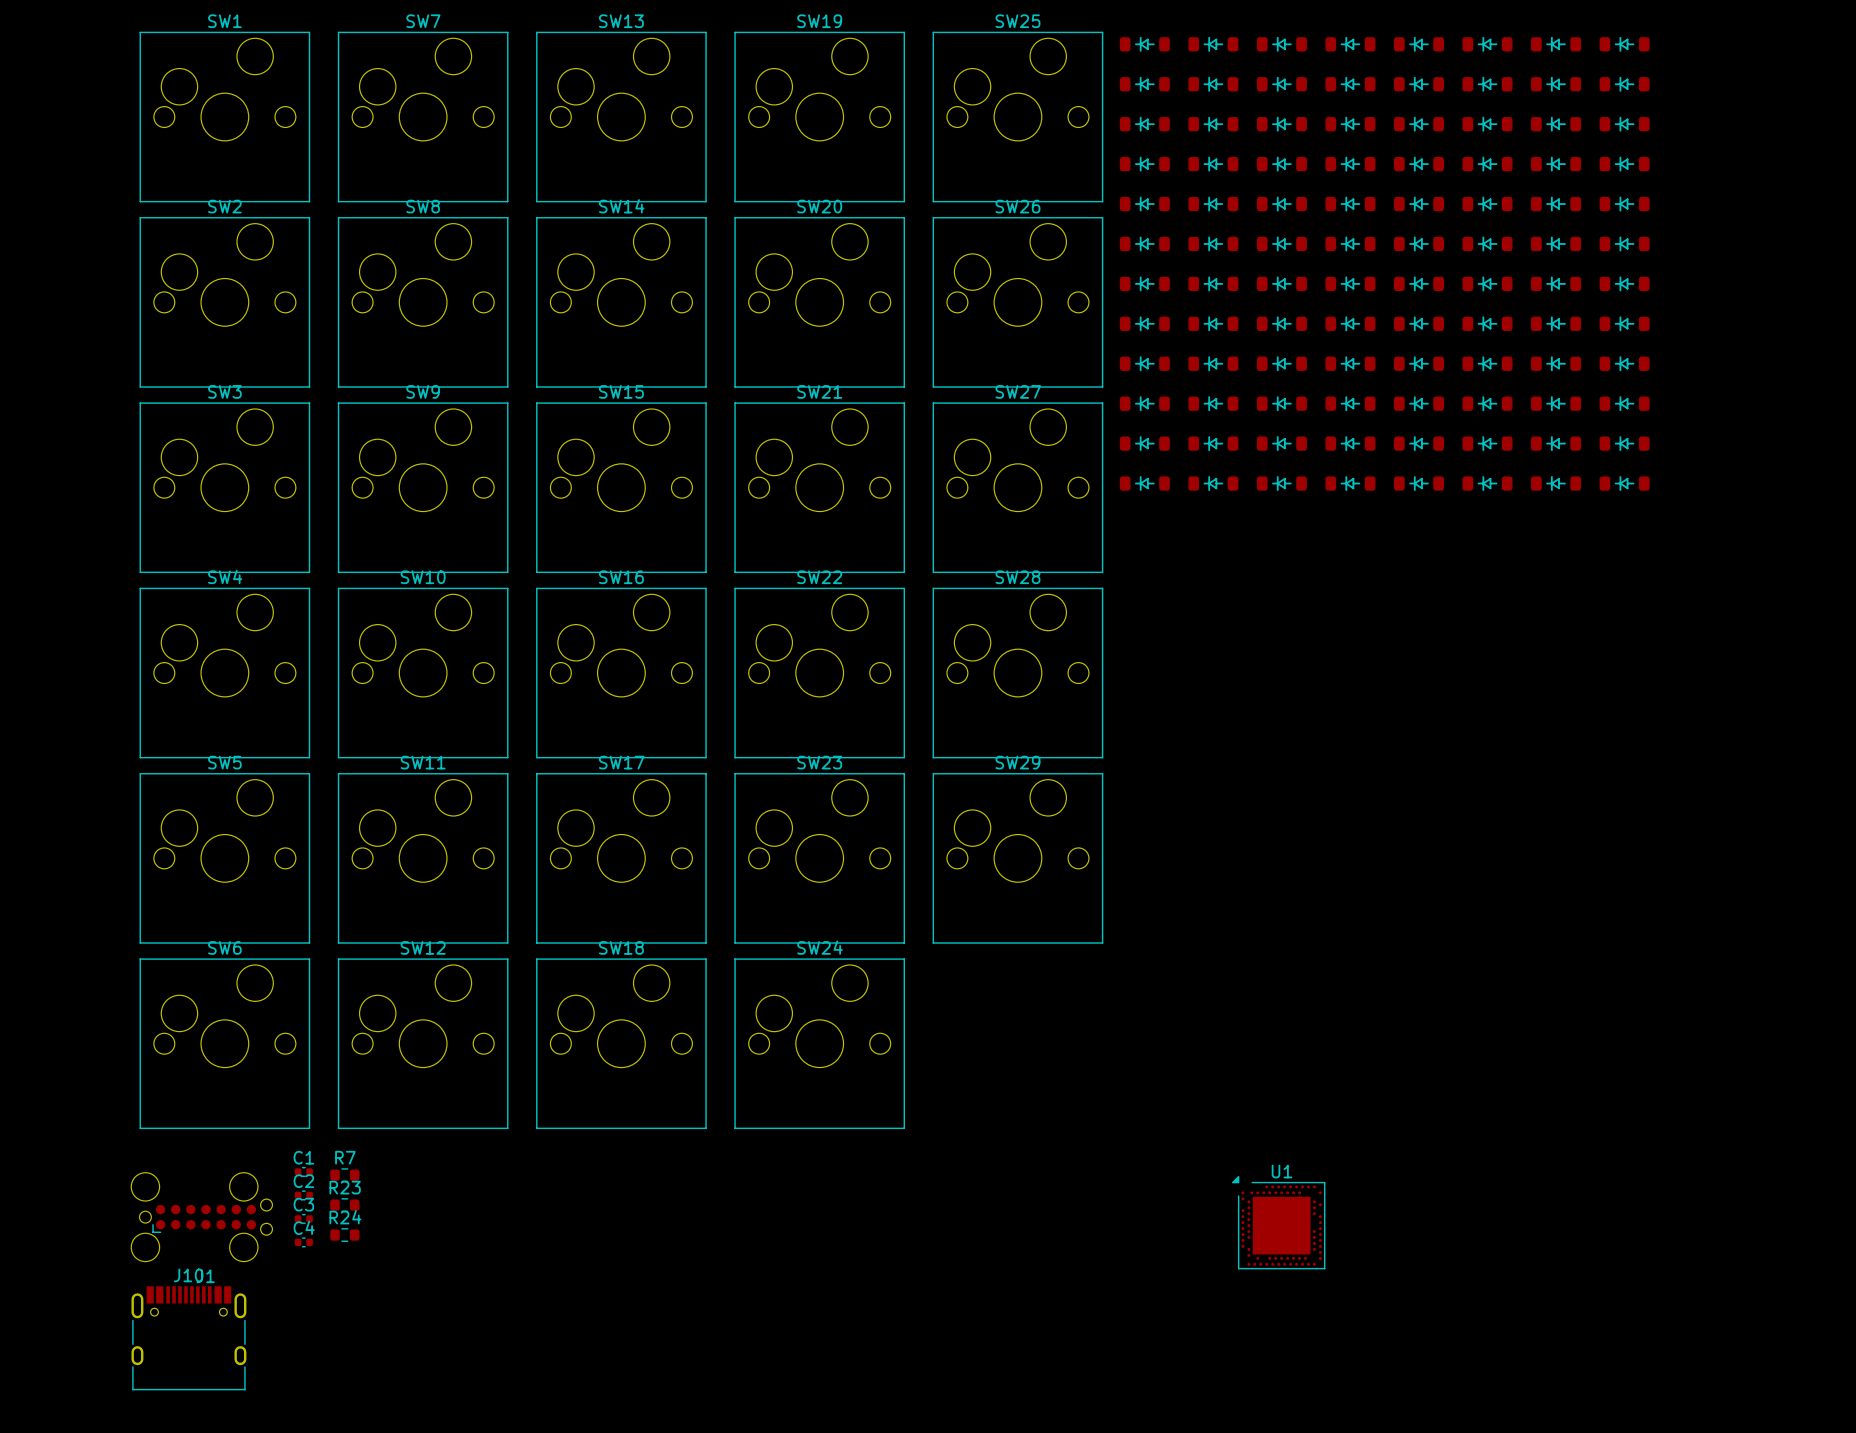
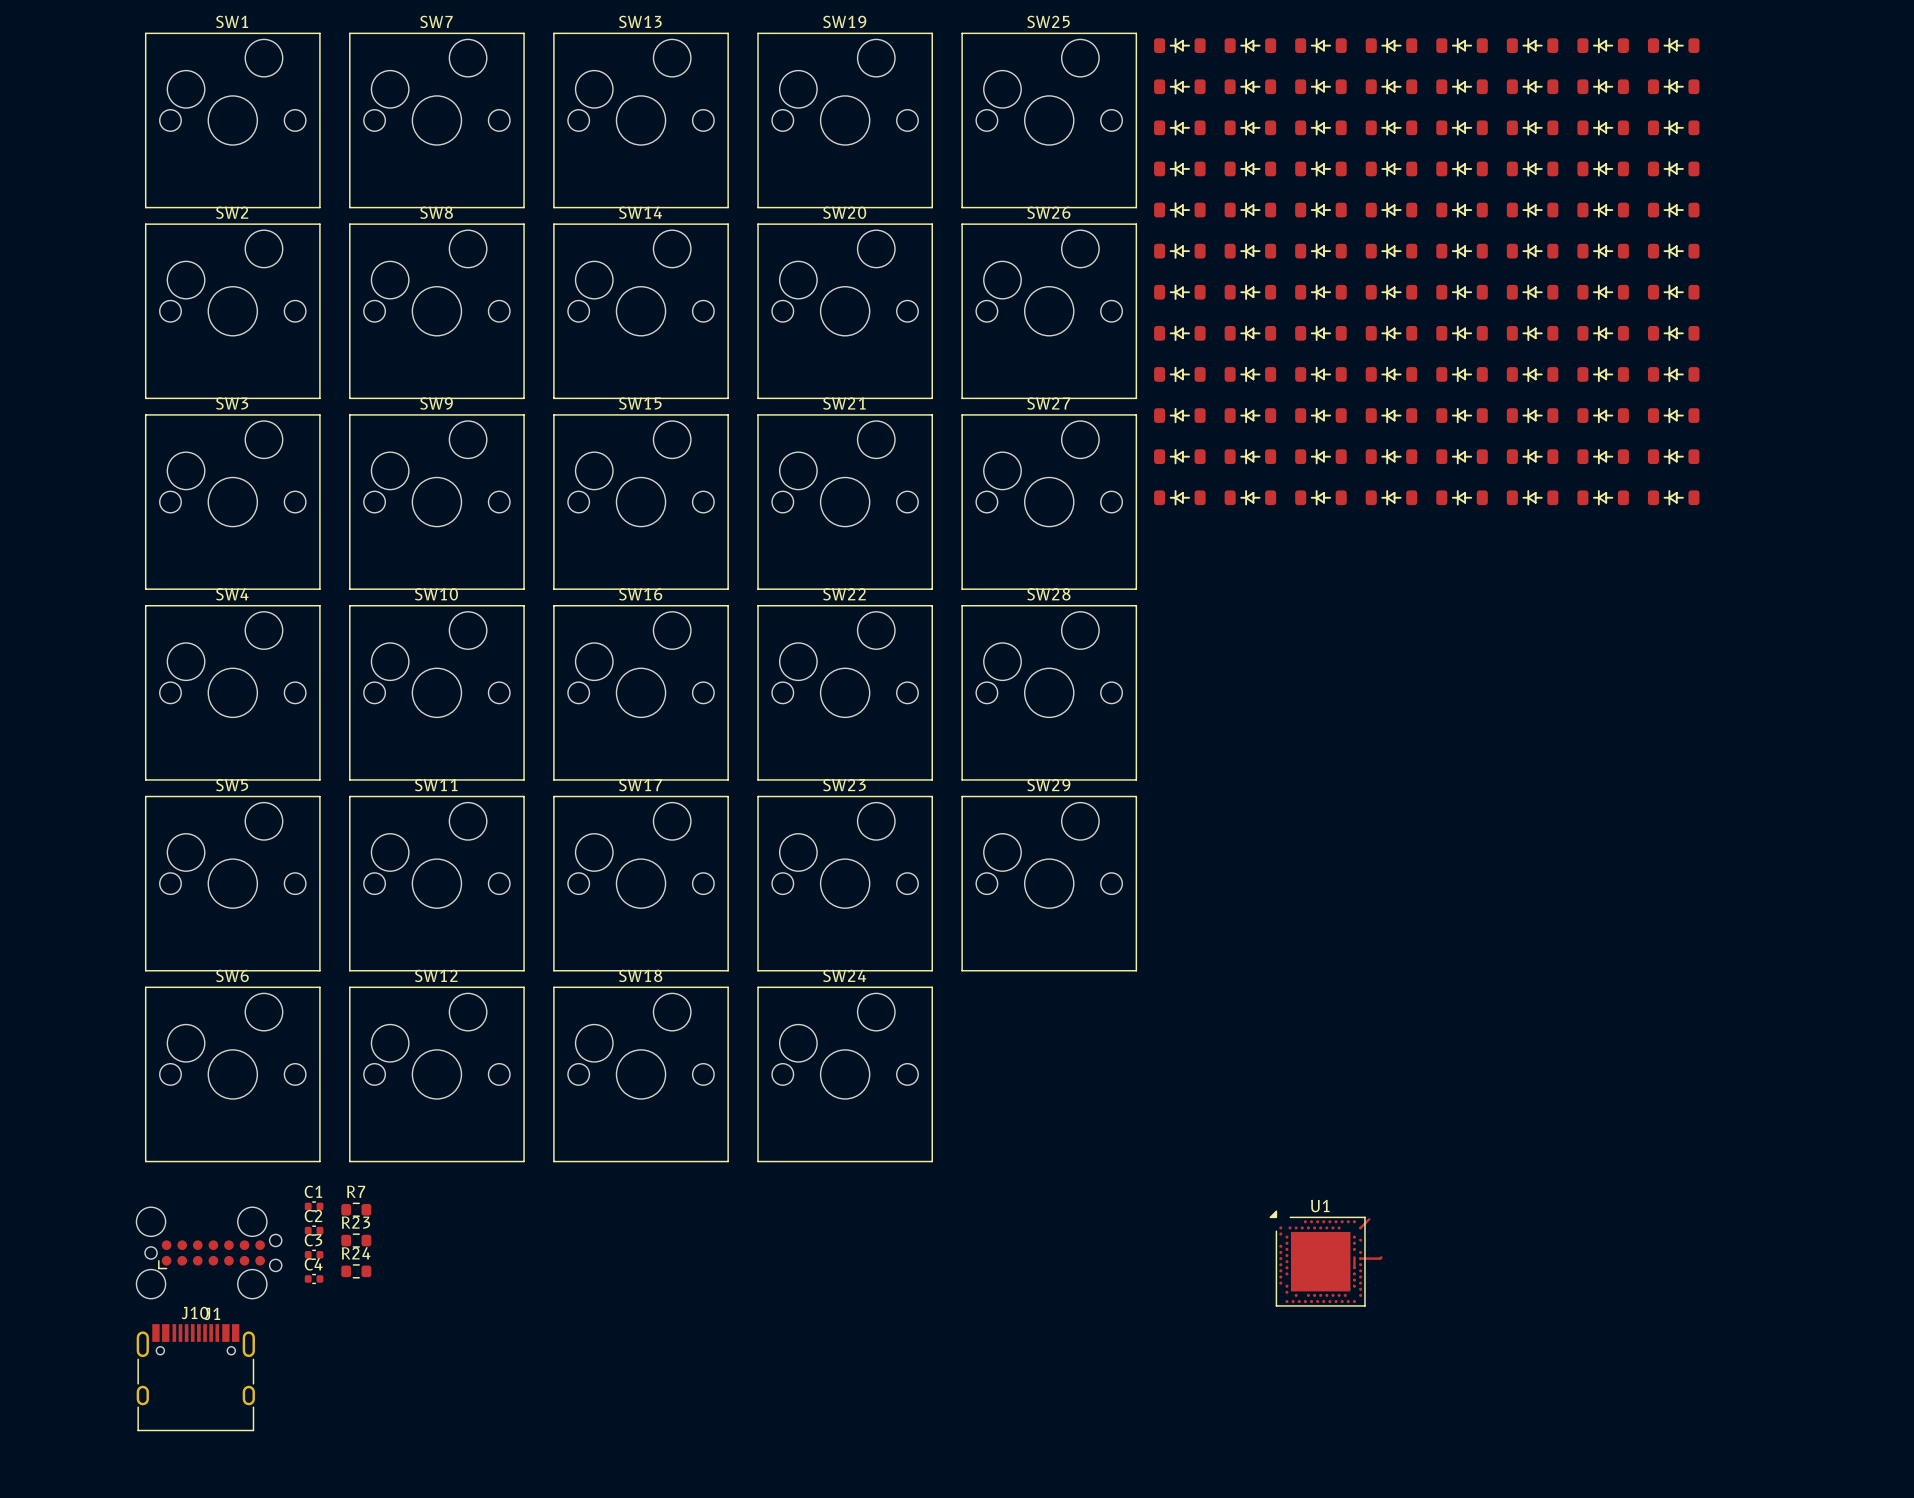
track: none -> (1369, 1219) (1360, 1227)
track: none -> (1354, 1257) (1354, 1267)
track: none -> (1381, 1257) (1360, 1258)

